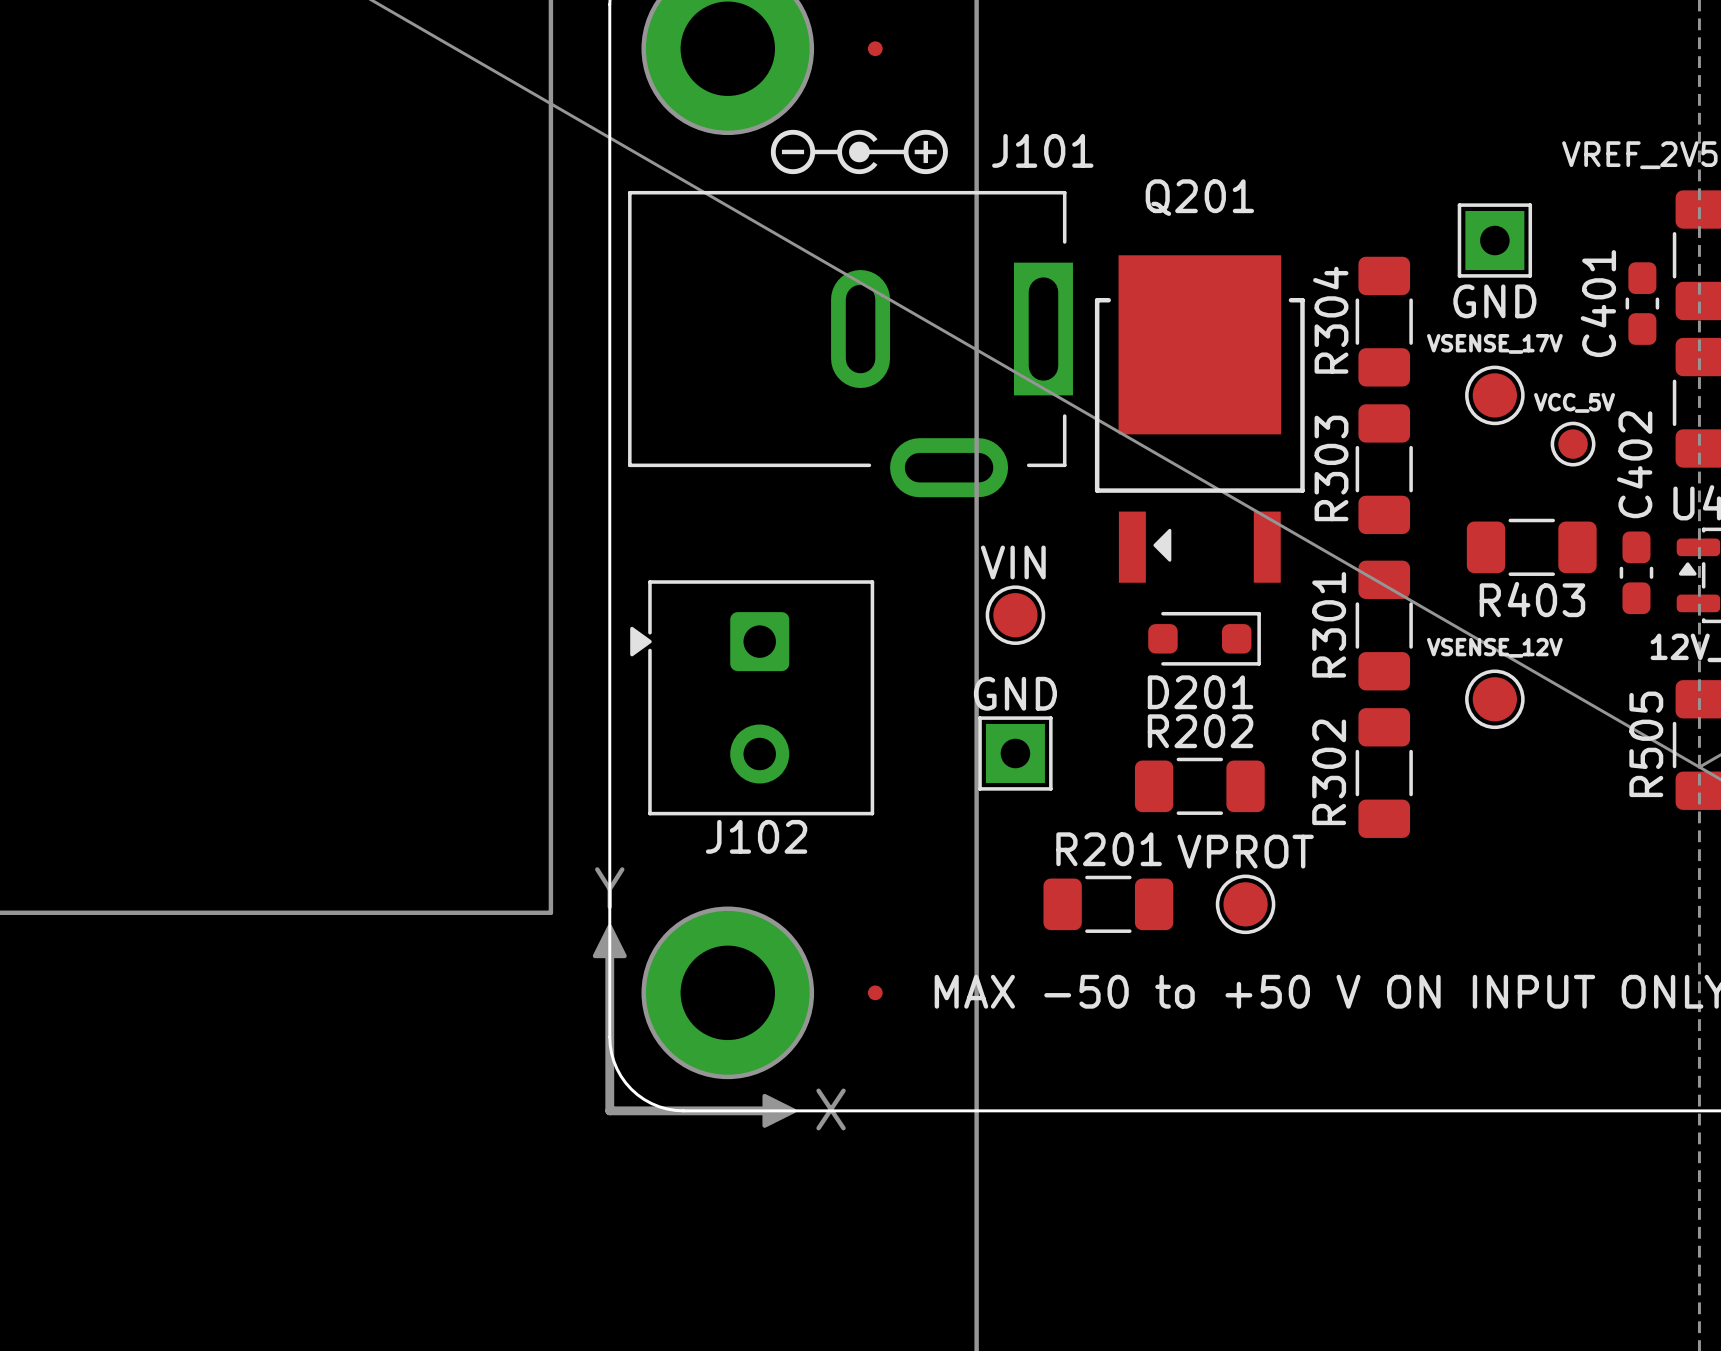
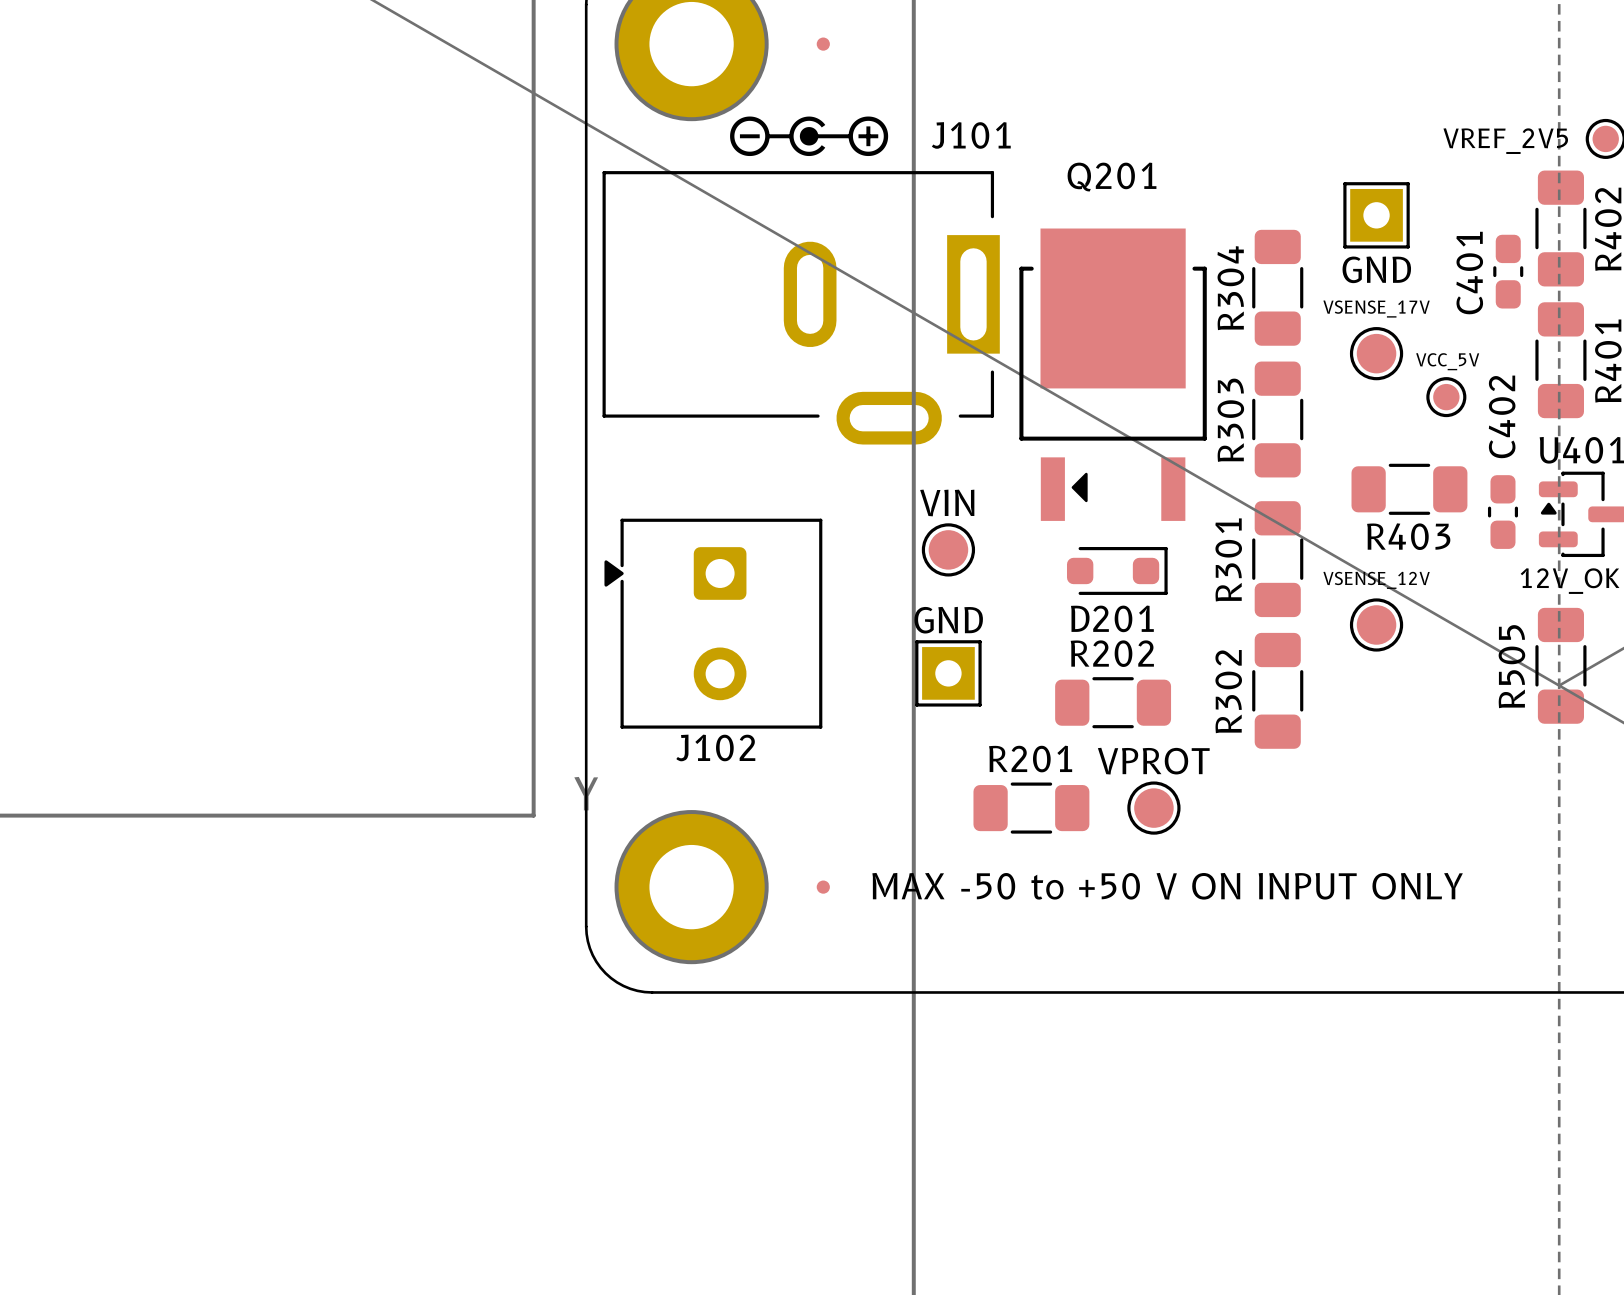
drawing: [592, 924, 627, 959] -> none
line: (609, 933) (609, 1110) (786, 1110) -> none
drawing: [762, 1093, 797, 1128] -> none
text: X (831, 1109) -> none

